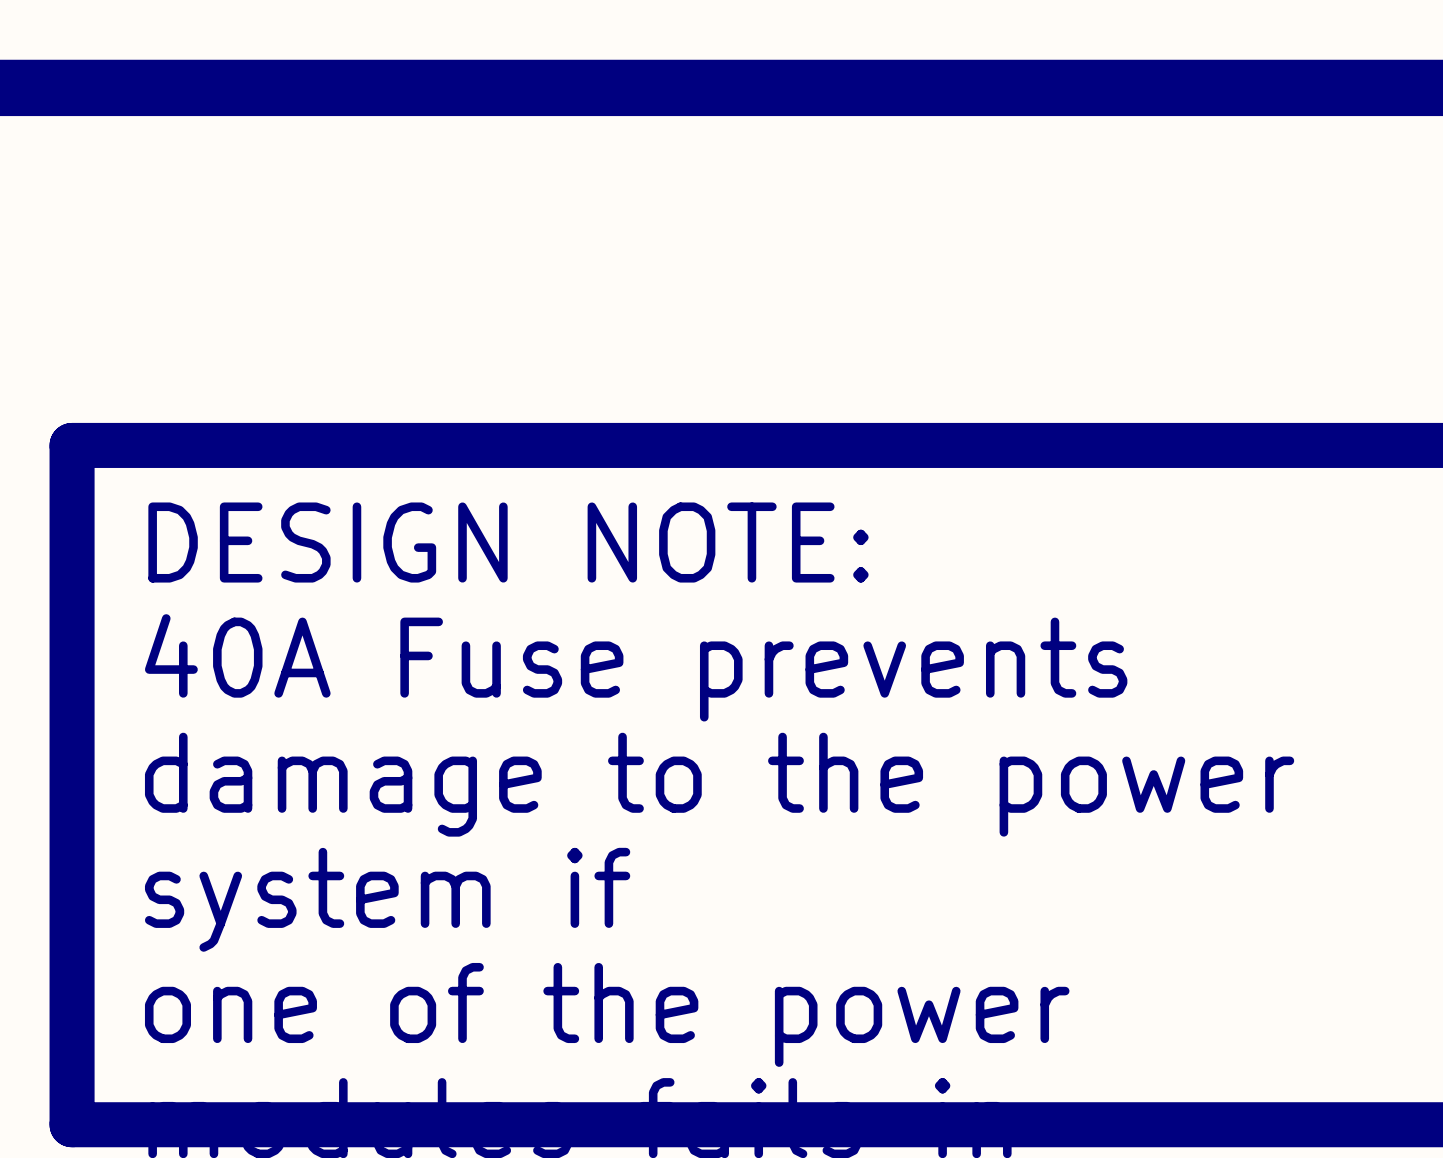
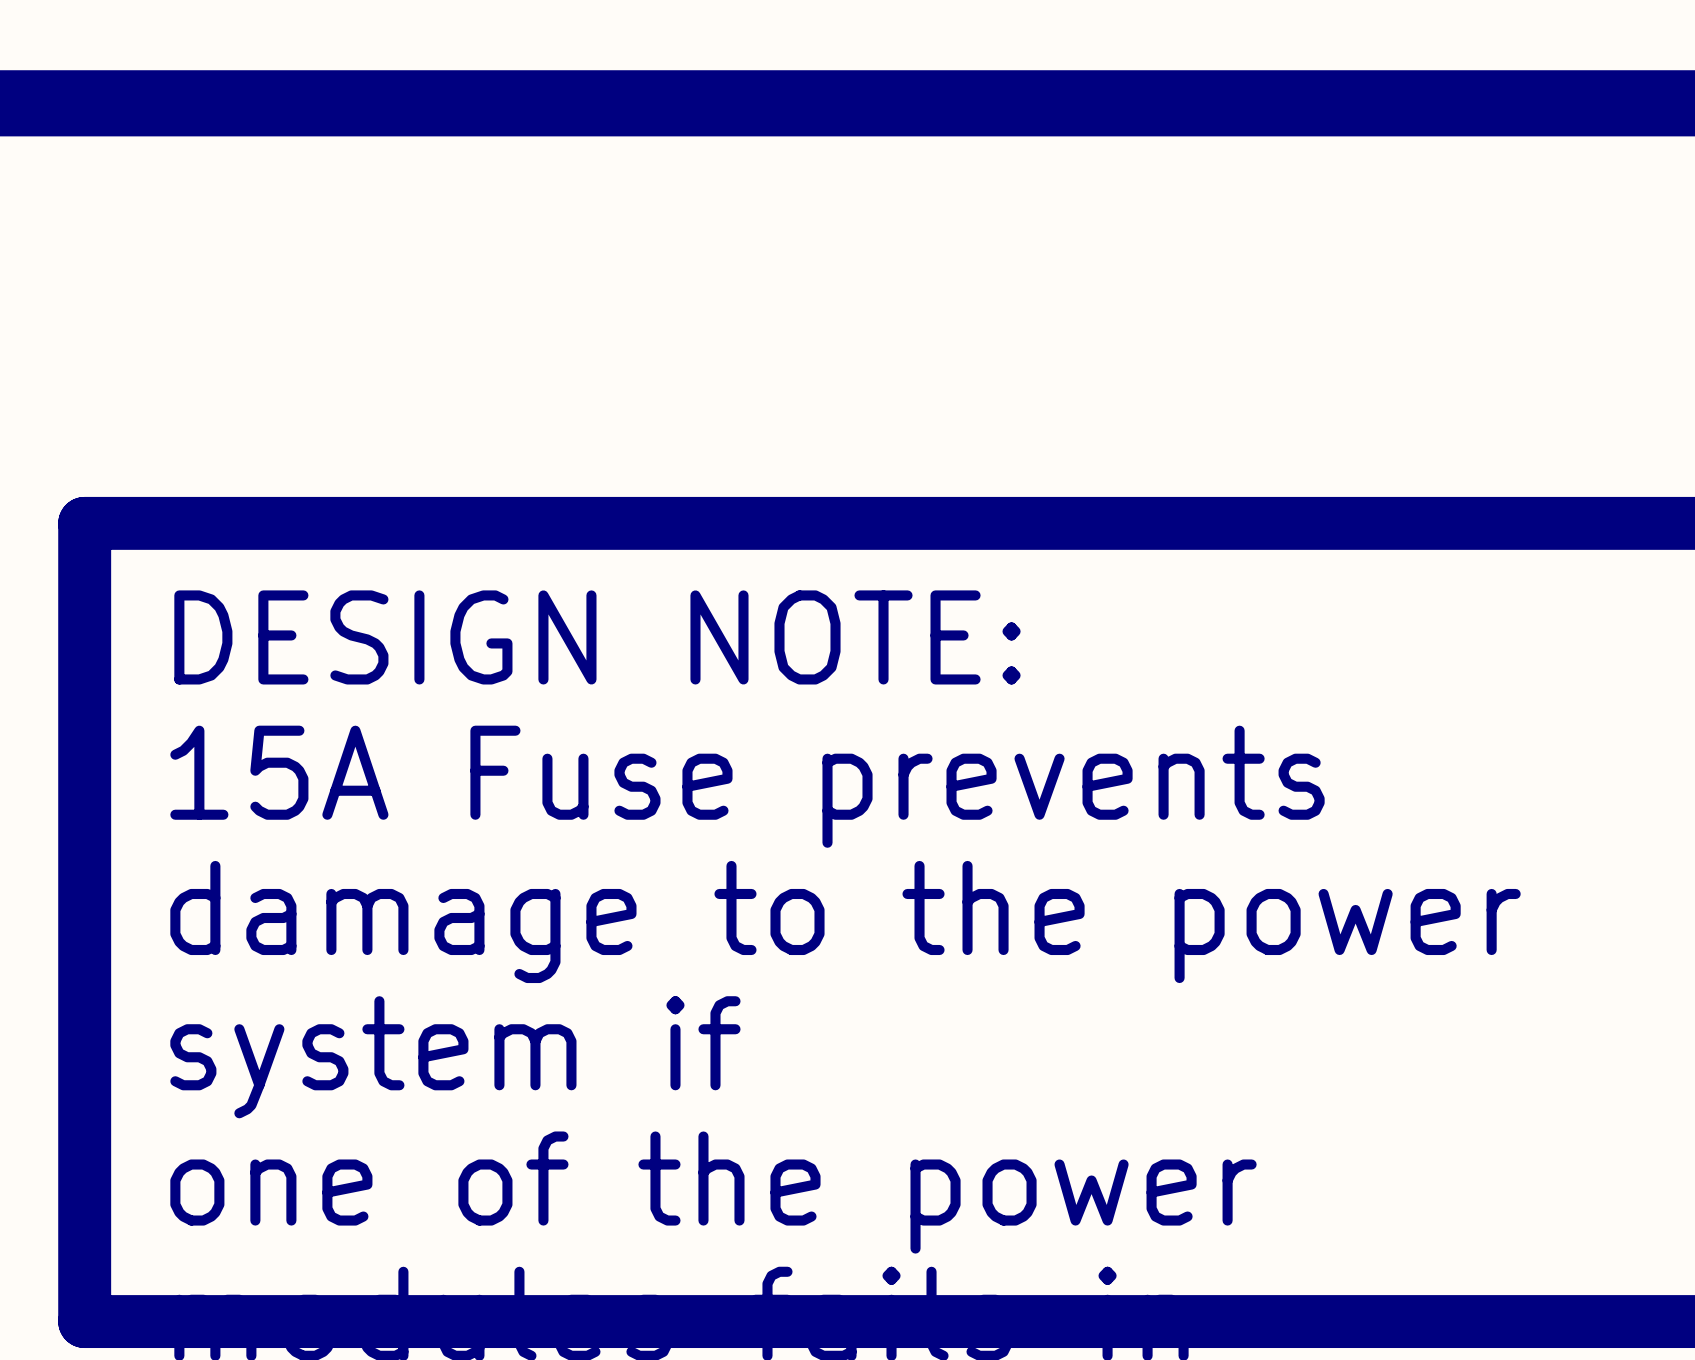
text: 40A Fuse prevents (636, 667) -> 15A Fuse prevents (747, 786)

